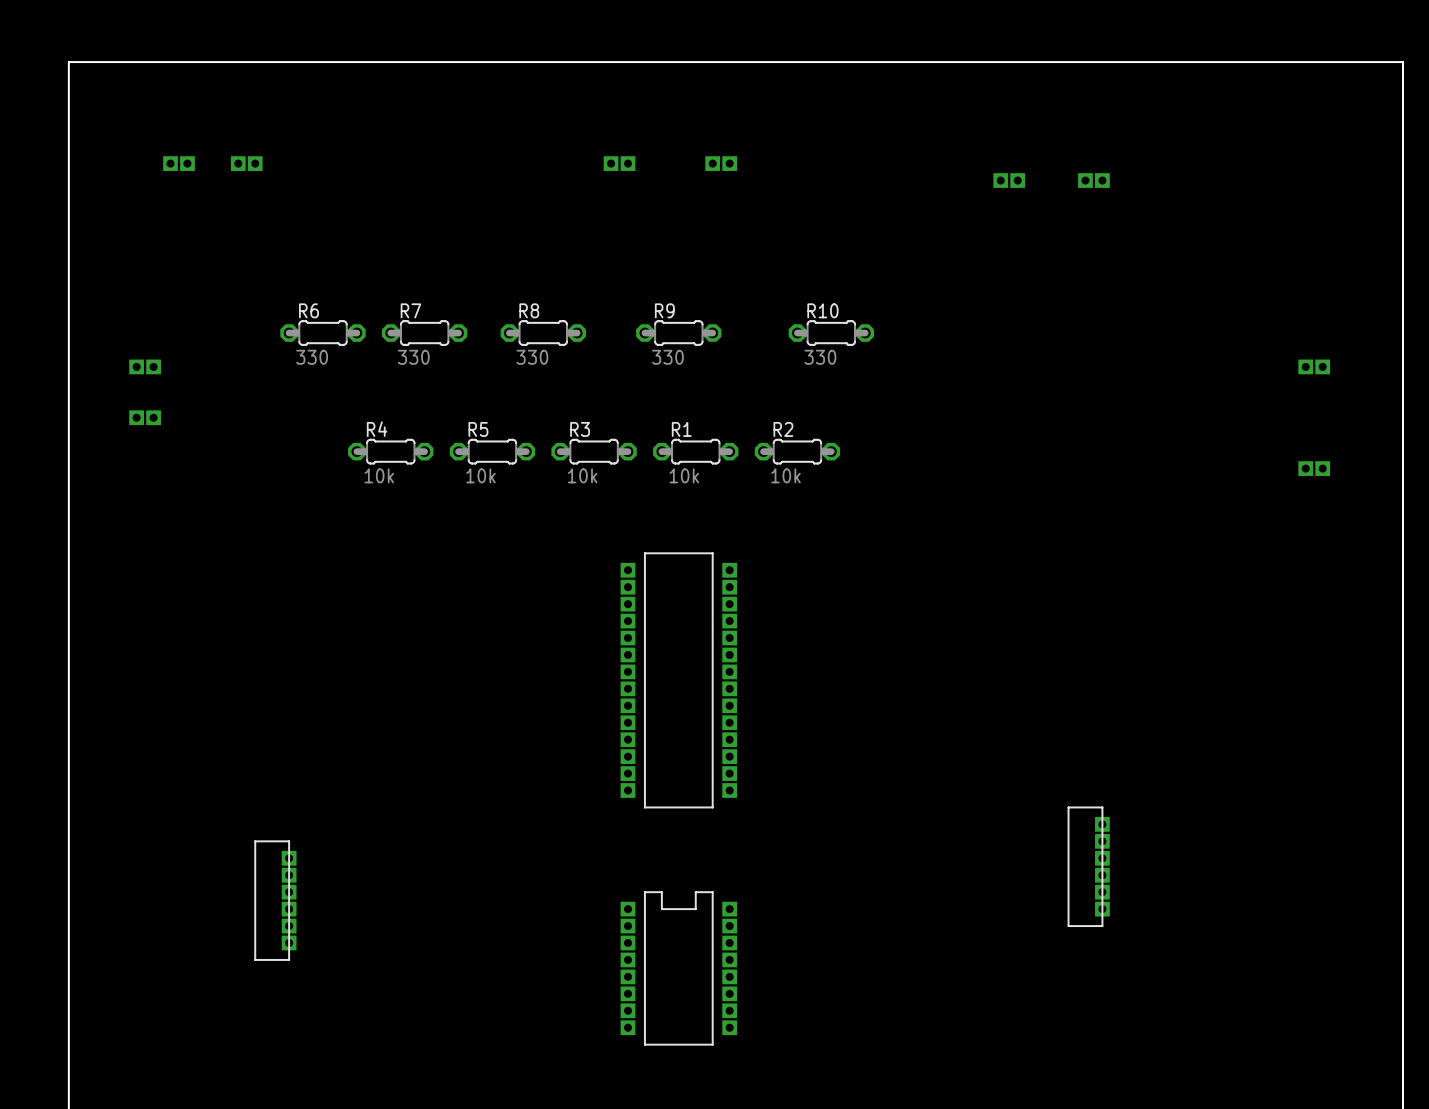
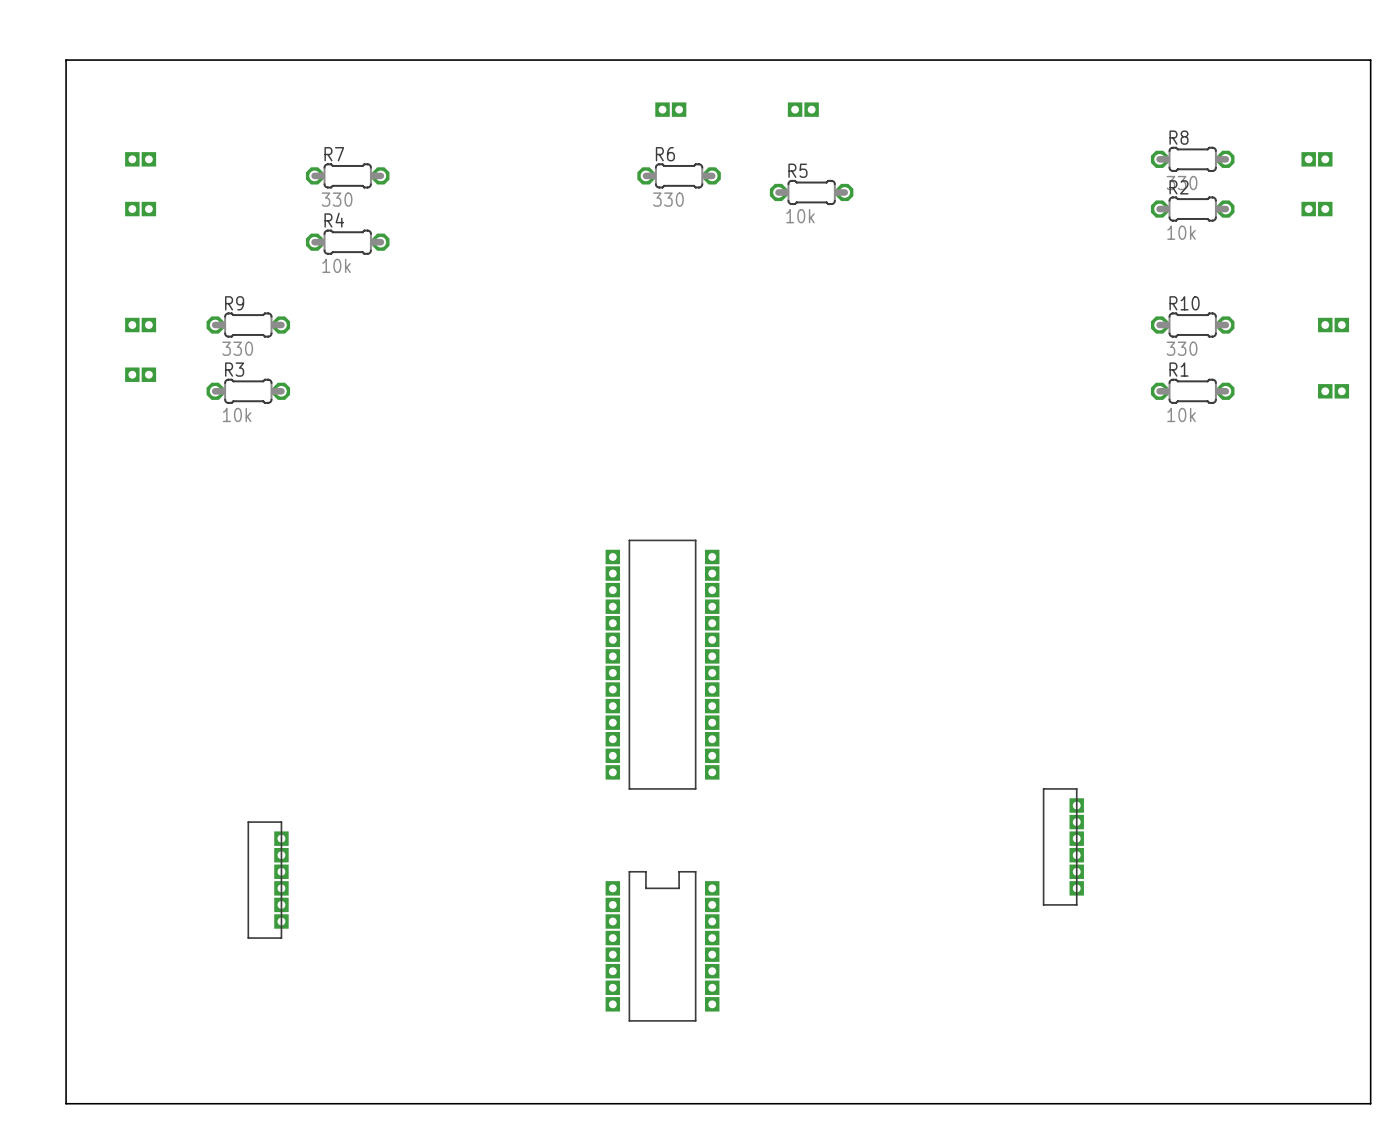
part: none -> (670, 109)
part: none -> (803, 109)
part: none -> (140, 159)
part: (178, 163) -> none
part: (246, 163) -> none
part: (619, 163) -> none
part: (721, 163) -> none
part: none -> (1316, 159)
part: (1009, 180) -> none
part: (1093, 180) -> none
part: none -> (140, 209)
part: none -> (1316, 209)
part: none -> (140, 325)
R6 position: (323, 333) -> (679, 175)
R7 position: (424, 333) -> (347, 175)
R8 position: (543, 333) -> (1192, 159)
R9 position: (678, 333) -> (248, 325)
R10 position: (831, 333) -> (1192, 325)
part: none -> (1333, 325)
part: (145, 366) -> none
part: (1314, 366) -> none
part: none -> (140, 374)
part: none -> (1333, 391)
part: (145, 417) -> none
R4 position: (390, 451) -> (347, 242)
R5 position: (492, 451) -> (811, 192)
R3 position: (594, 451) -> (248, 391)
R1 position: (695, 451) -> (1192, 391)
R2 position: (797, 451) -> (1192, 209)
part: (1314, 468) -> none

